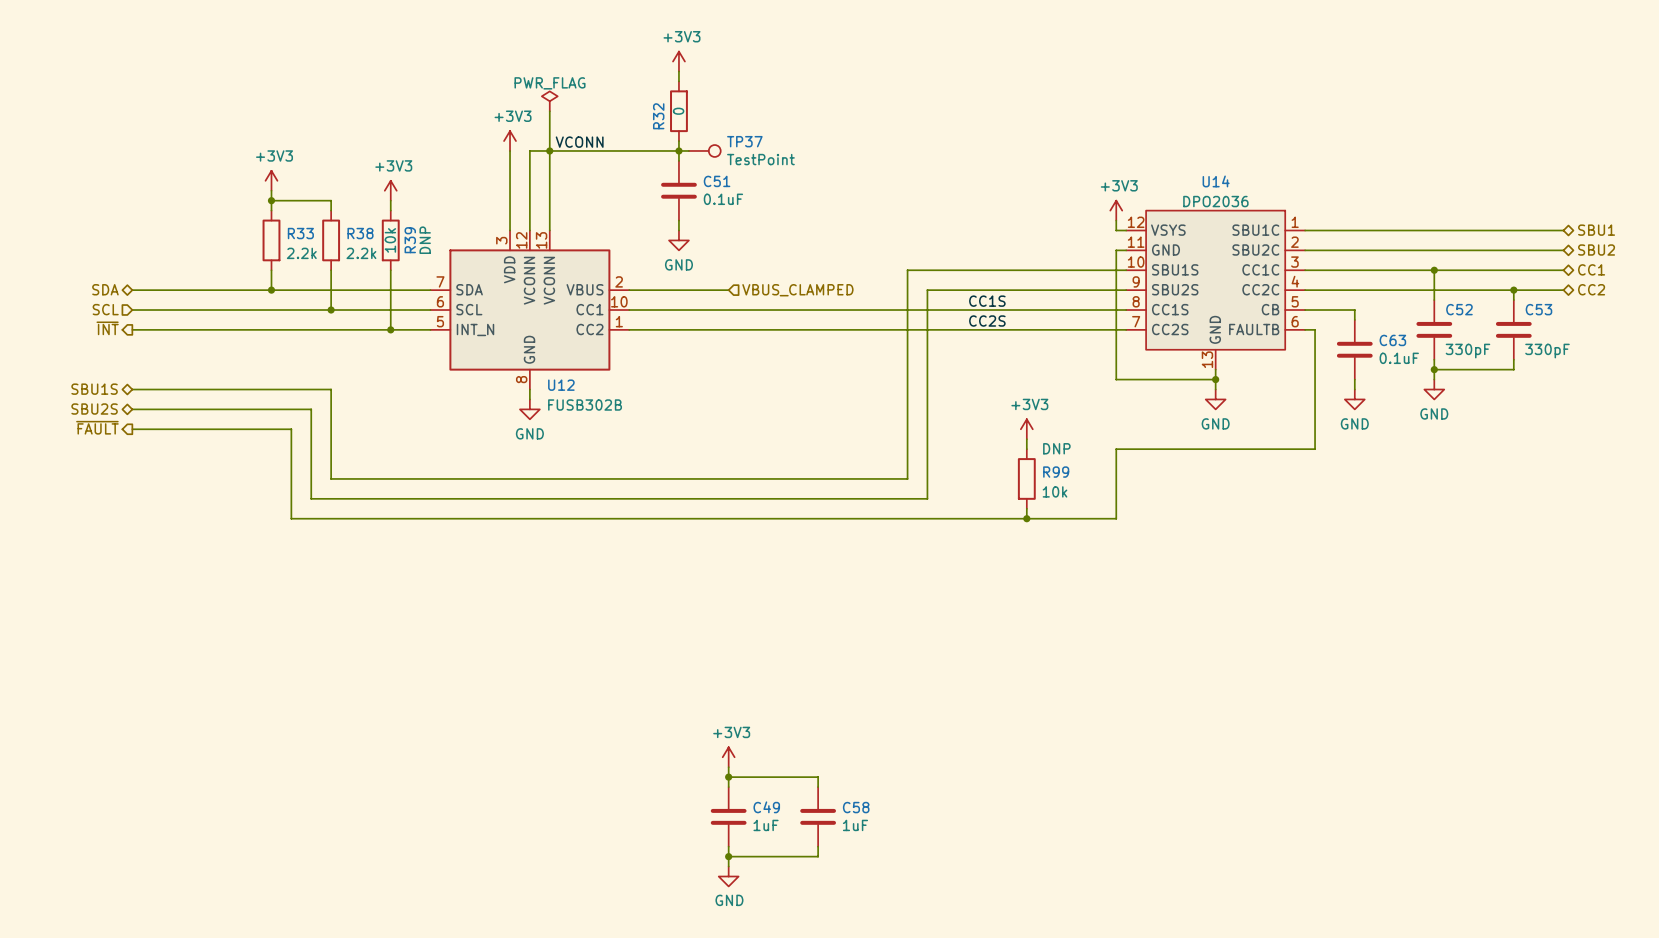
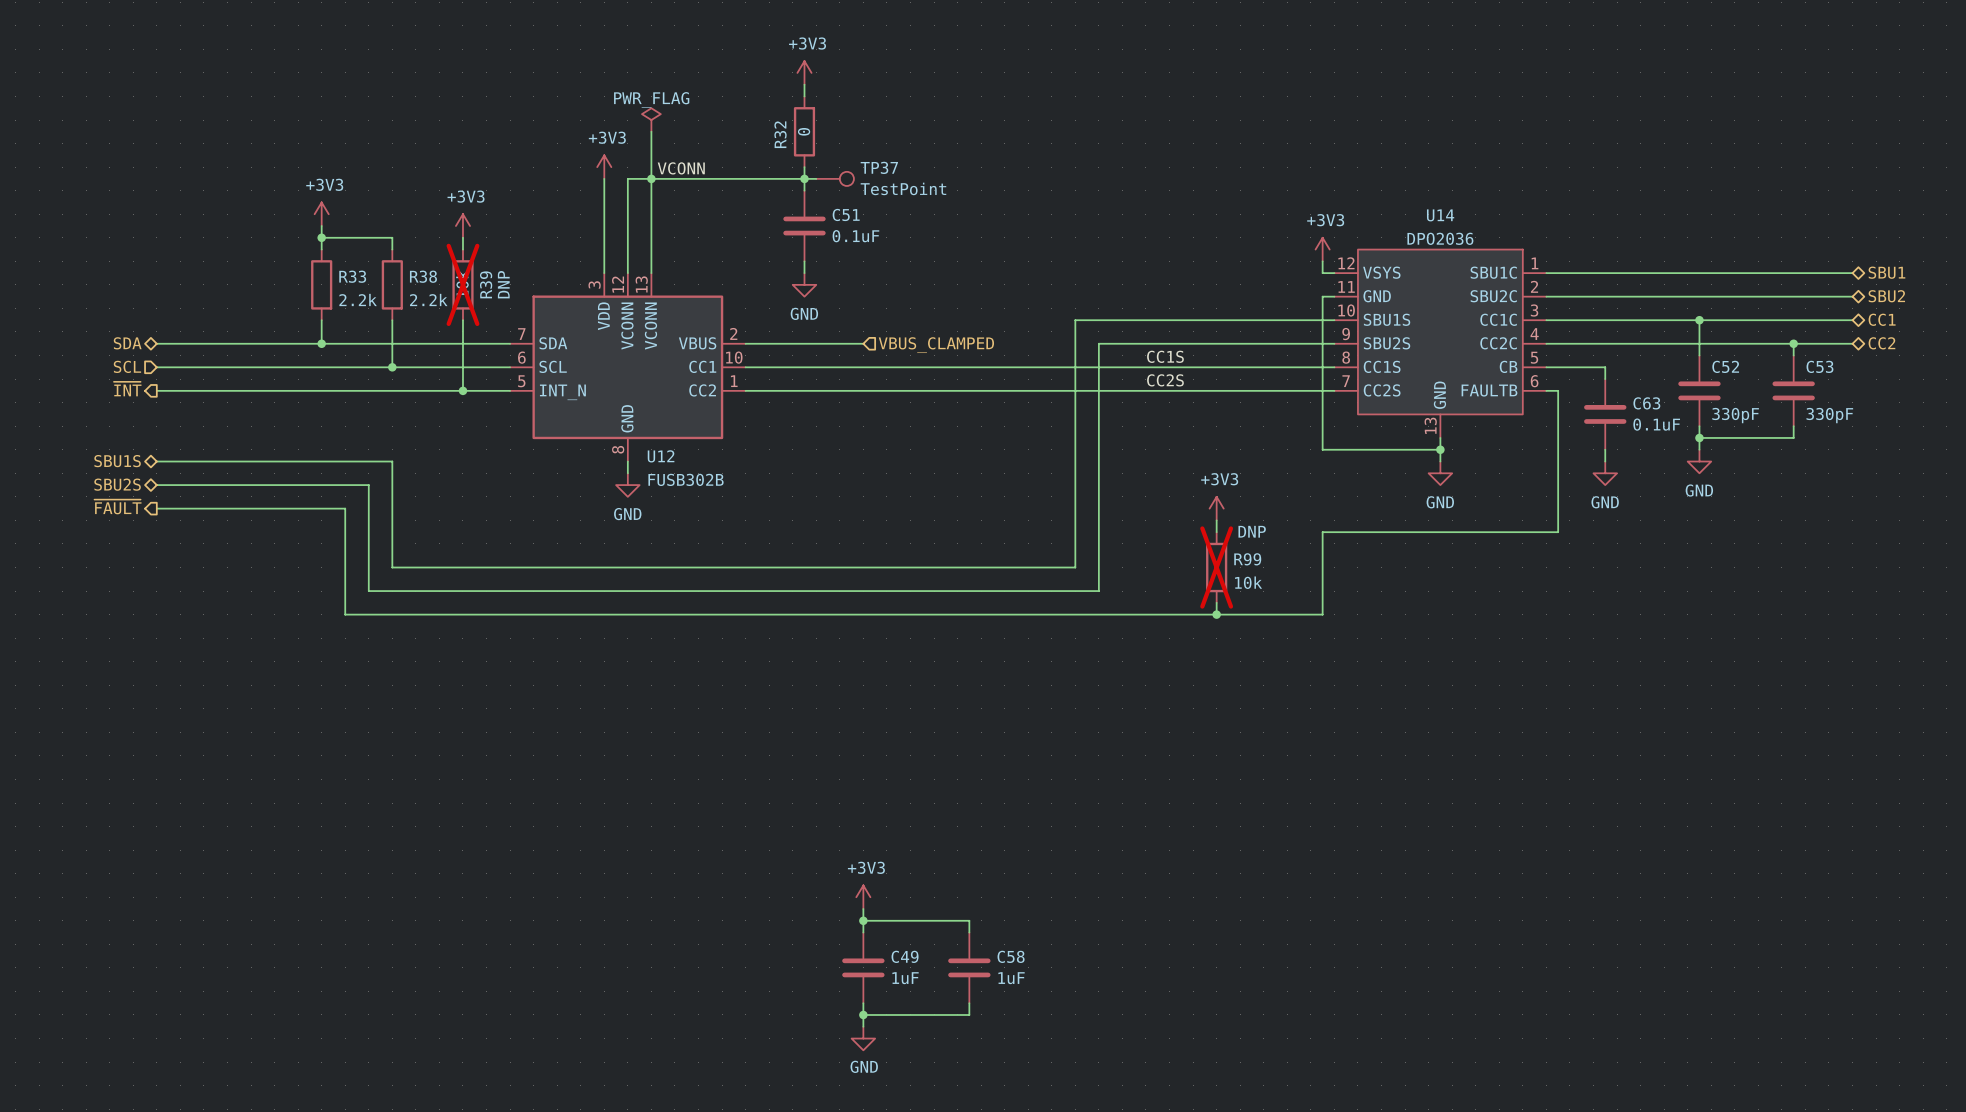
R39 do-not-place cross: none -> (462, 284)
R99 do-not-place cross: none -> (1216, 567)

